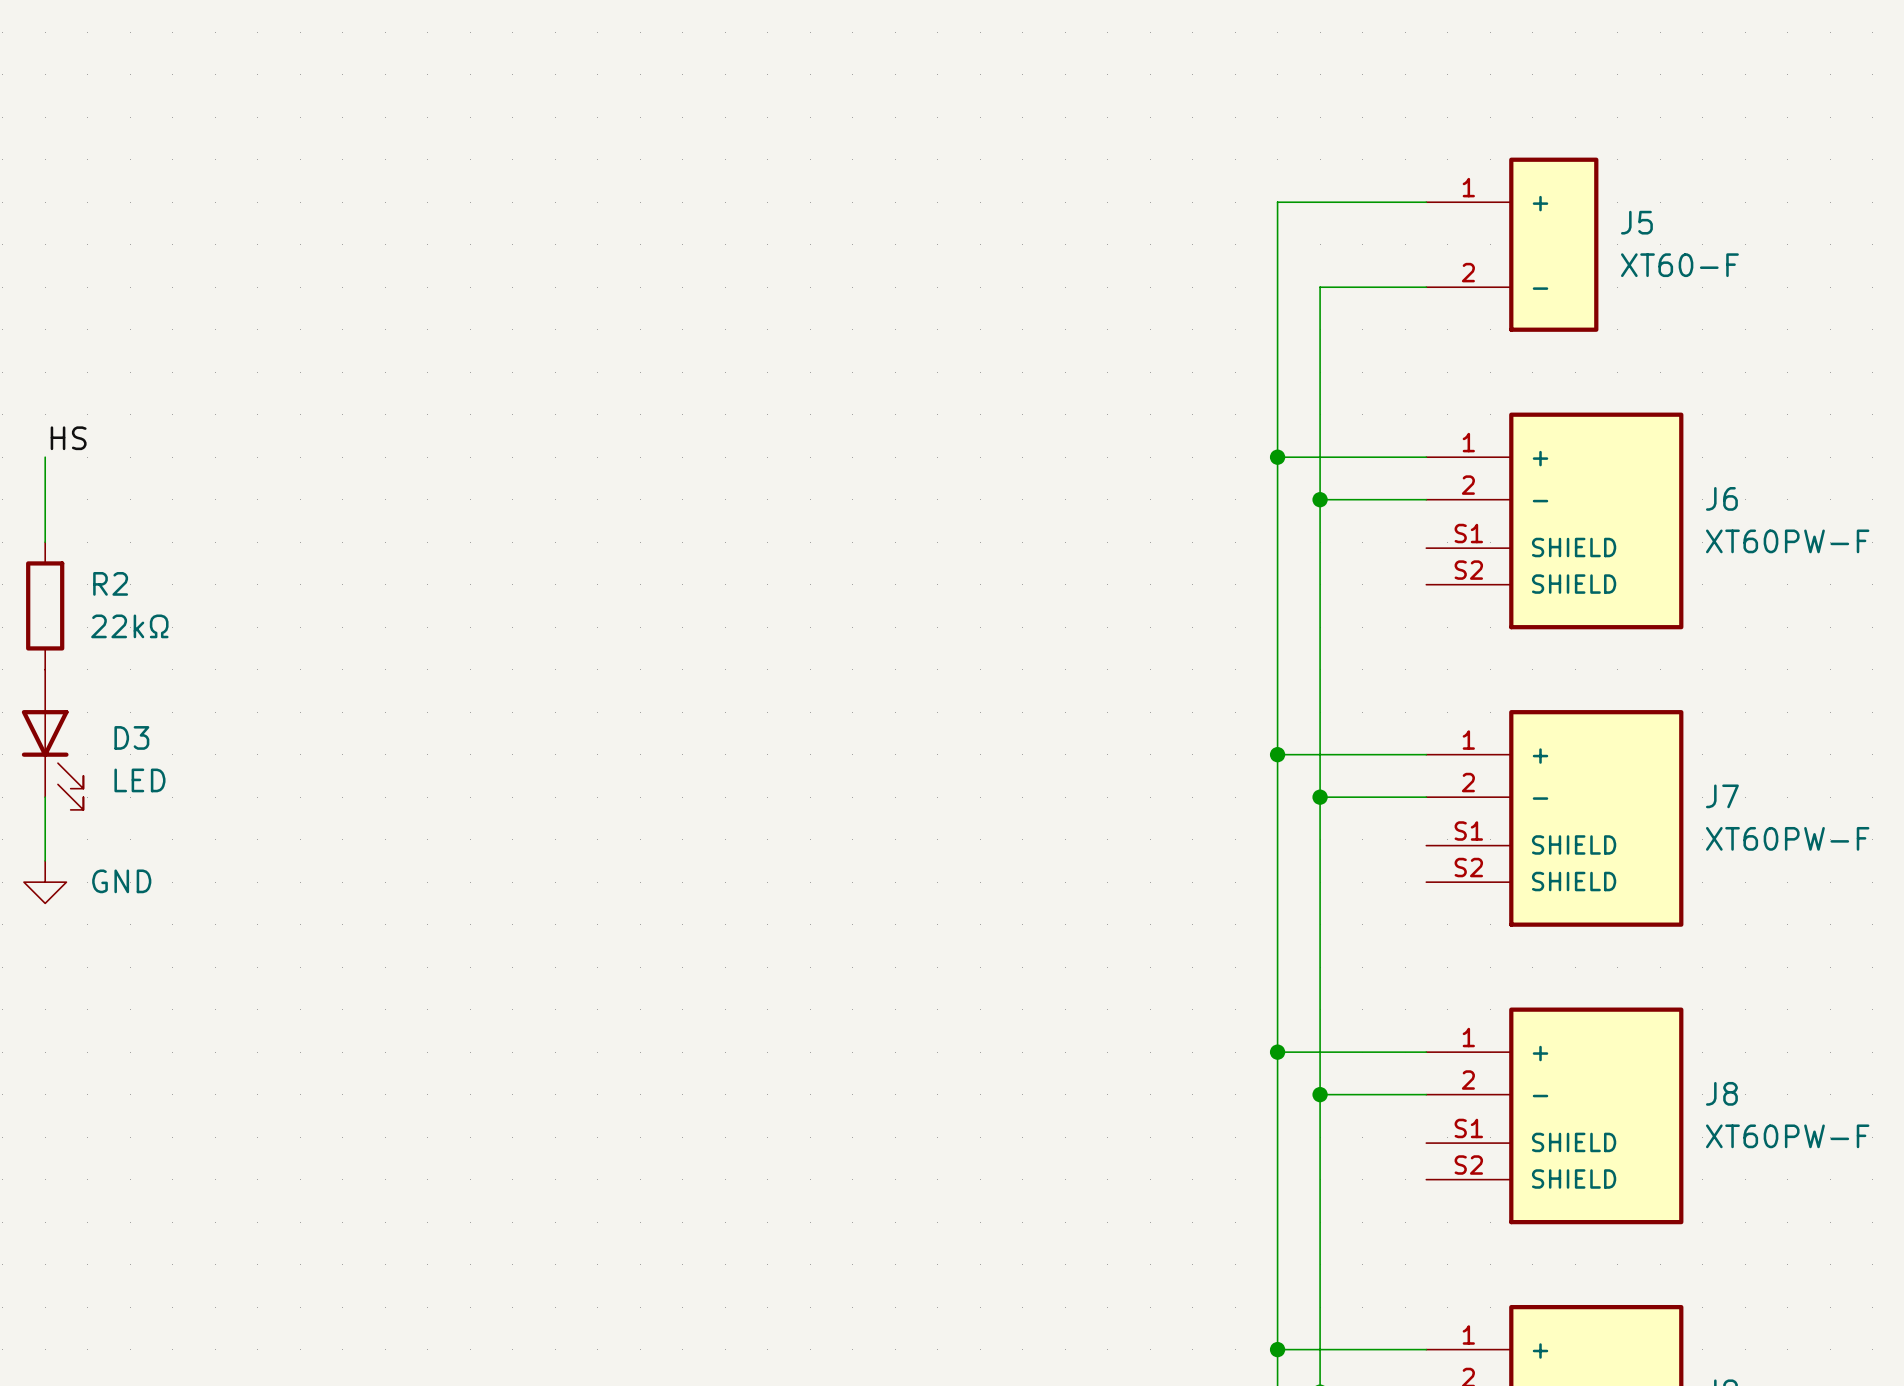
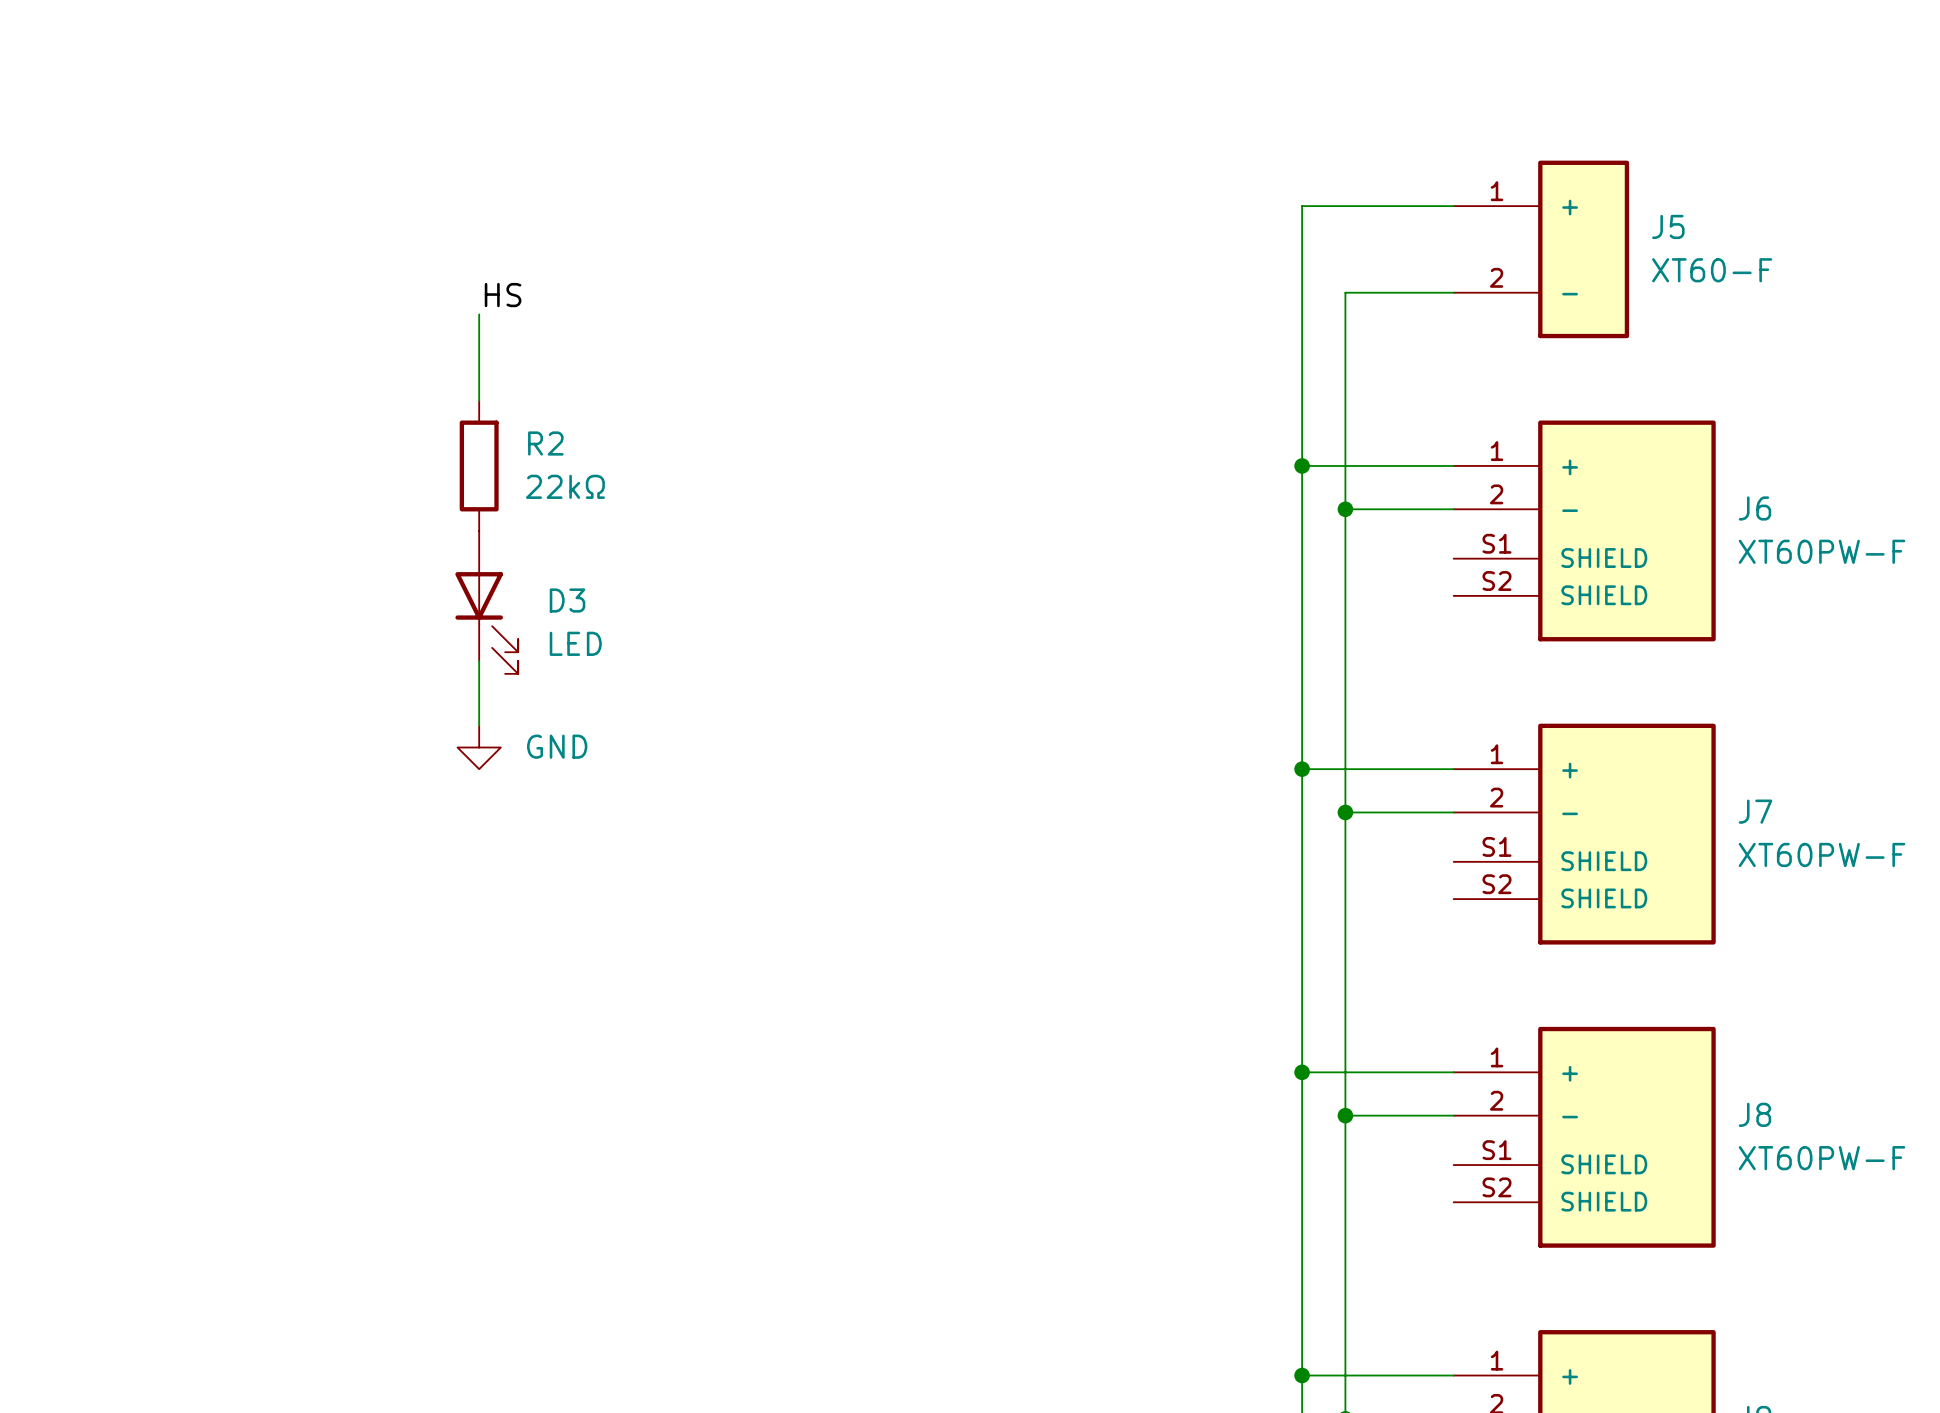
label: none -> HS (503, 295)
wire: none -> (479, 314) (479, 401)
label: HS (68, 438) -> none
wire: (45, 457) (45, 542) -> none
R2 position: (45, 605) -> (479, 465)
wire: none -> (479, 660) (479, 725)
power symbol: none -> GND (479, 747)
D3 position: (52, 739) -> (486, 602)
wire: (45, 797) (45, 860) -> none
power symbol: GND (45, 882) -> none

